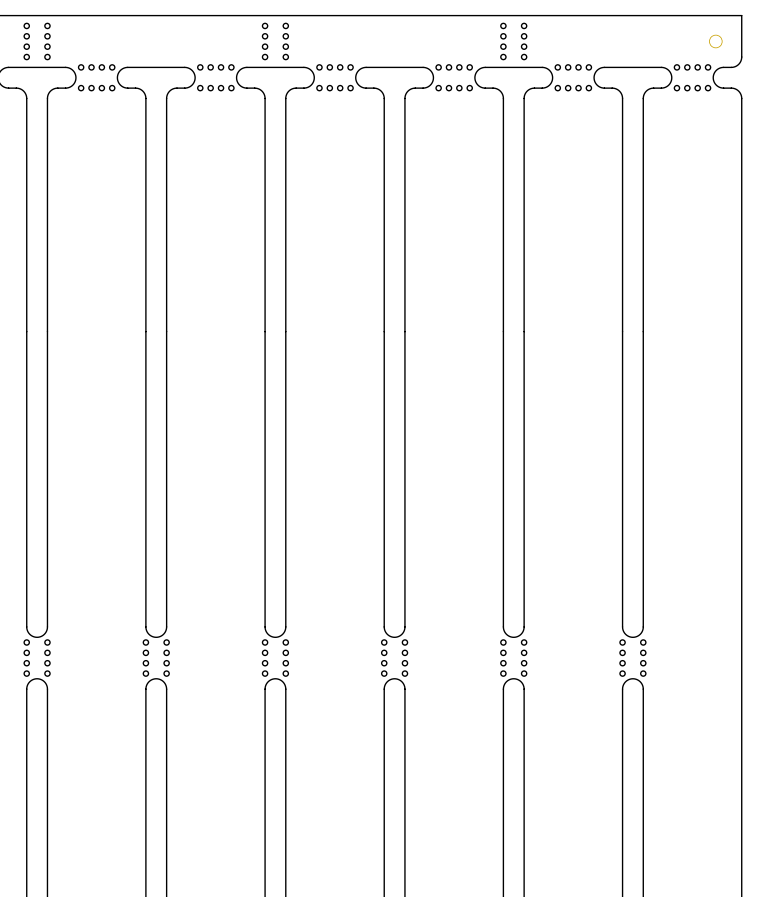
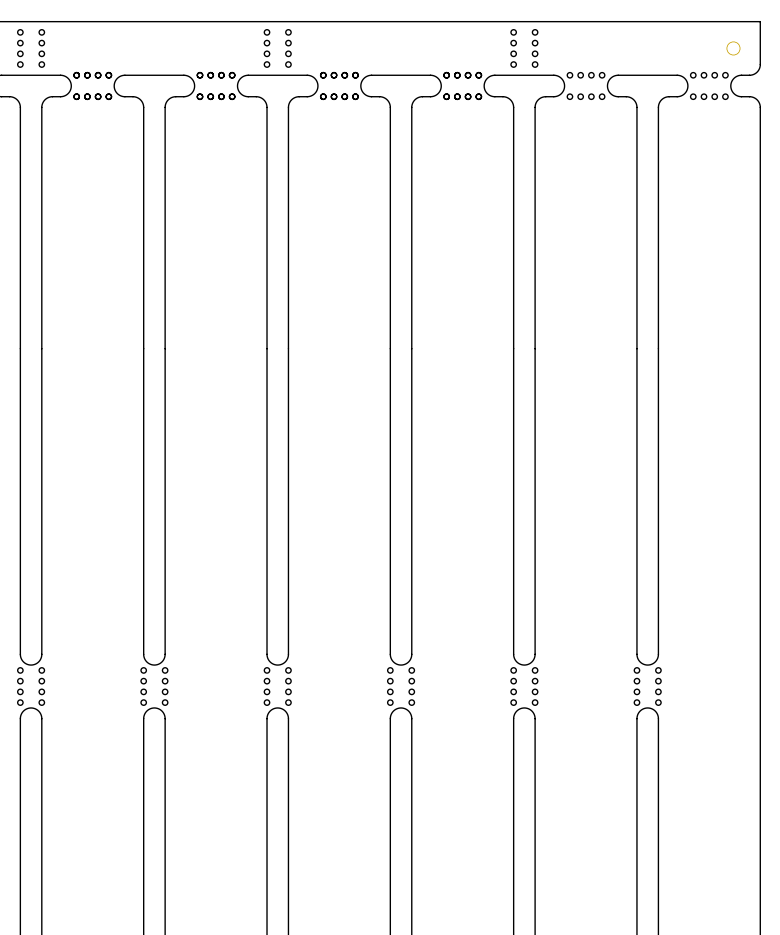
part: none -> (92, 85)
part: none -> (216, 85)
part: none -> (339, 85)
part: none -> (462, 85)

